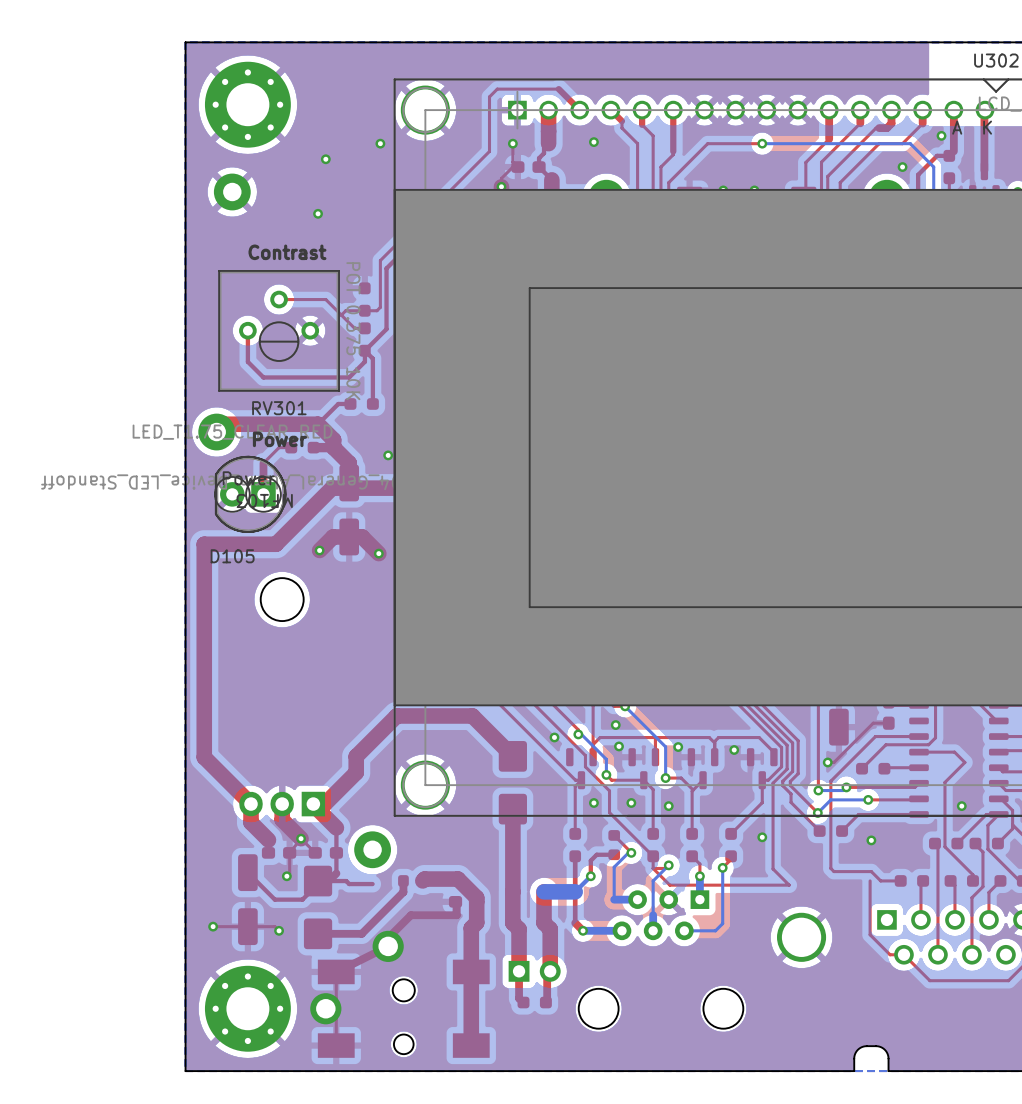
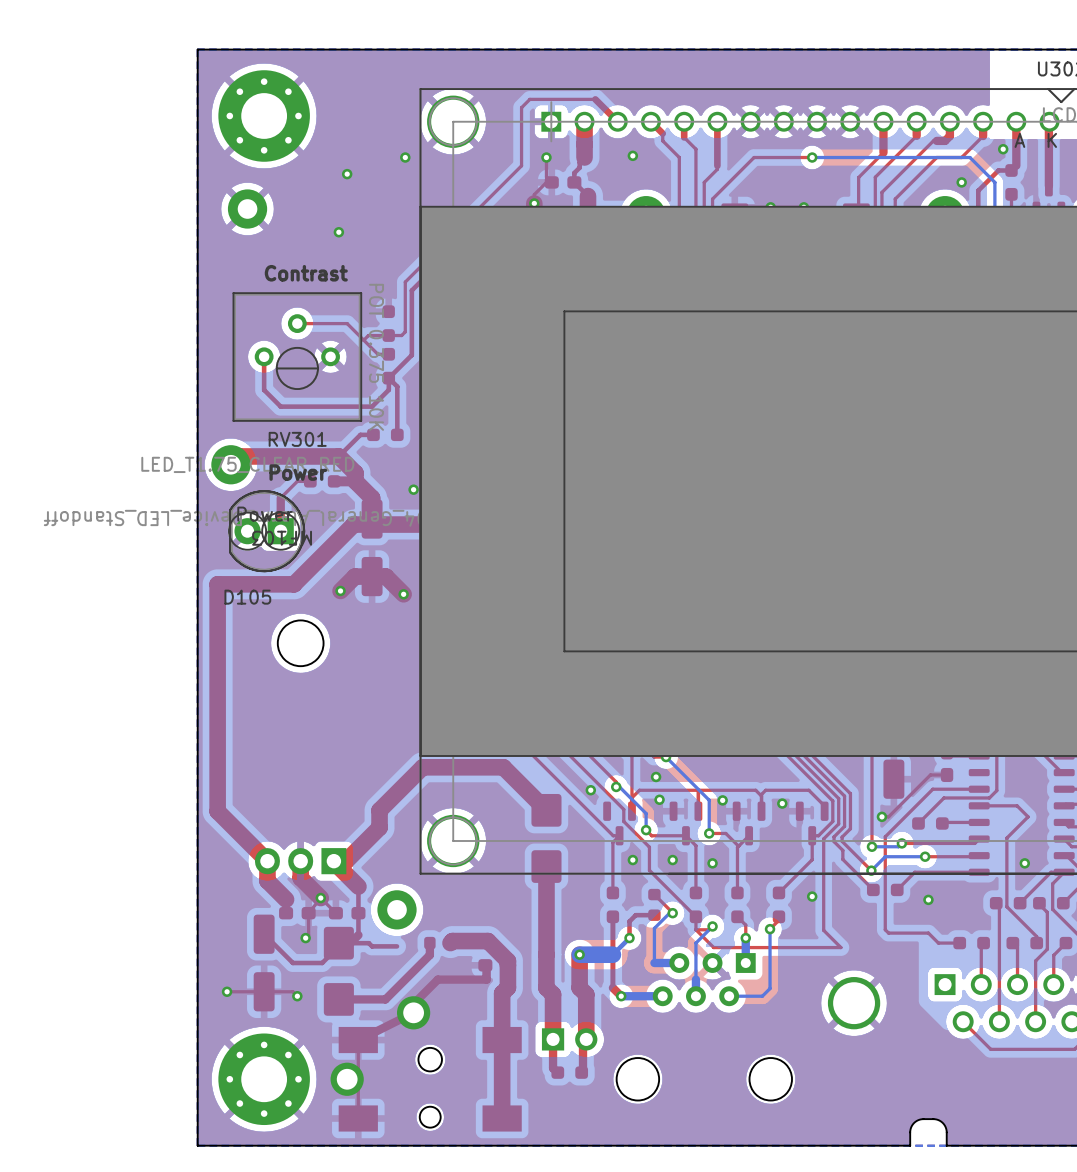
top track: (870, 880) (870, 934) (890, 954) (903, 954) -> none
via: none -> (579, 954)

